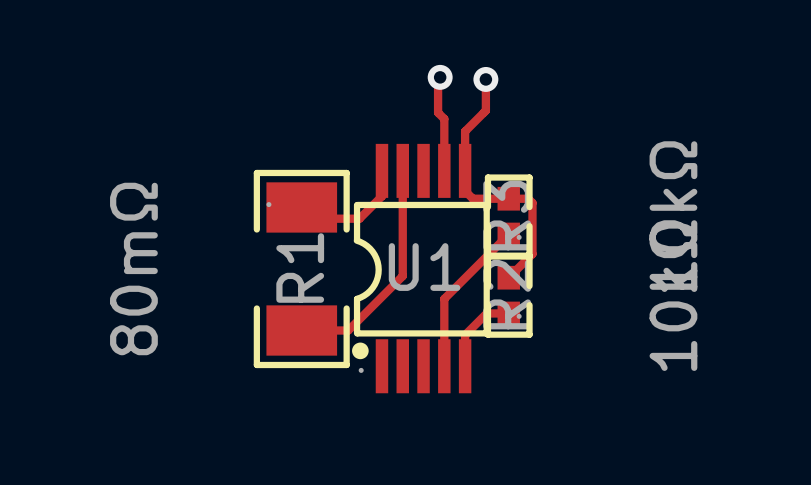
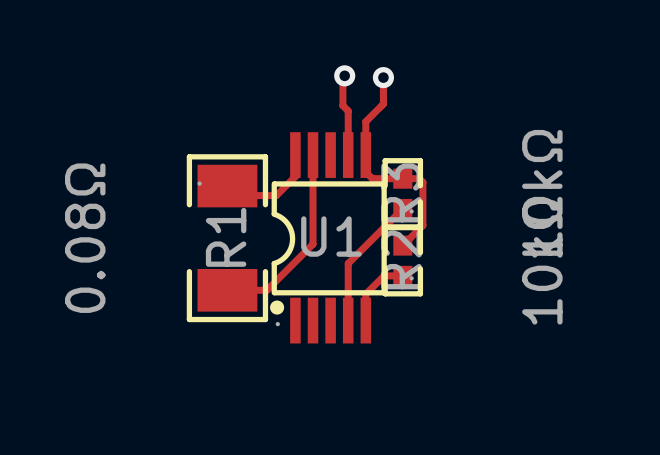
R1 value: 80mΩ (133, 268) -> 0.08Ω (85, 238)

